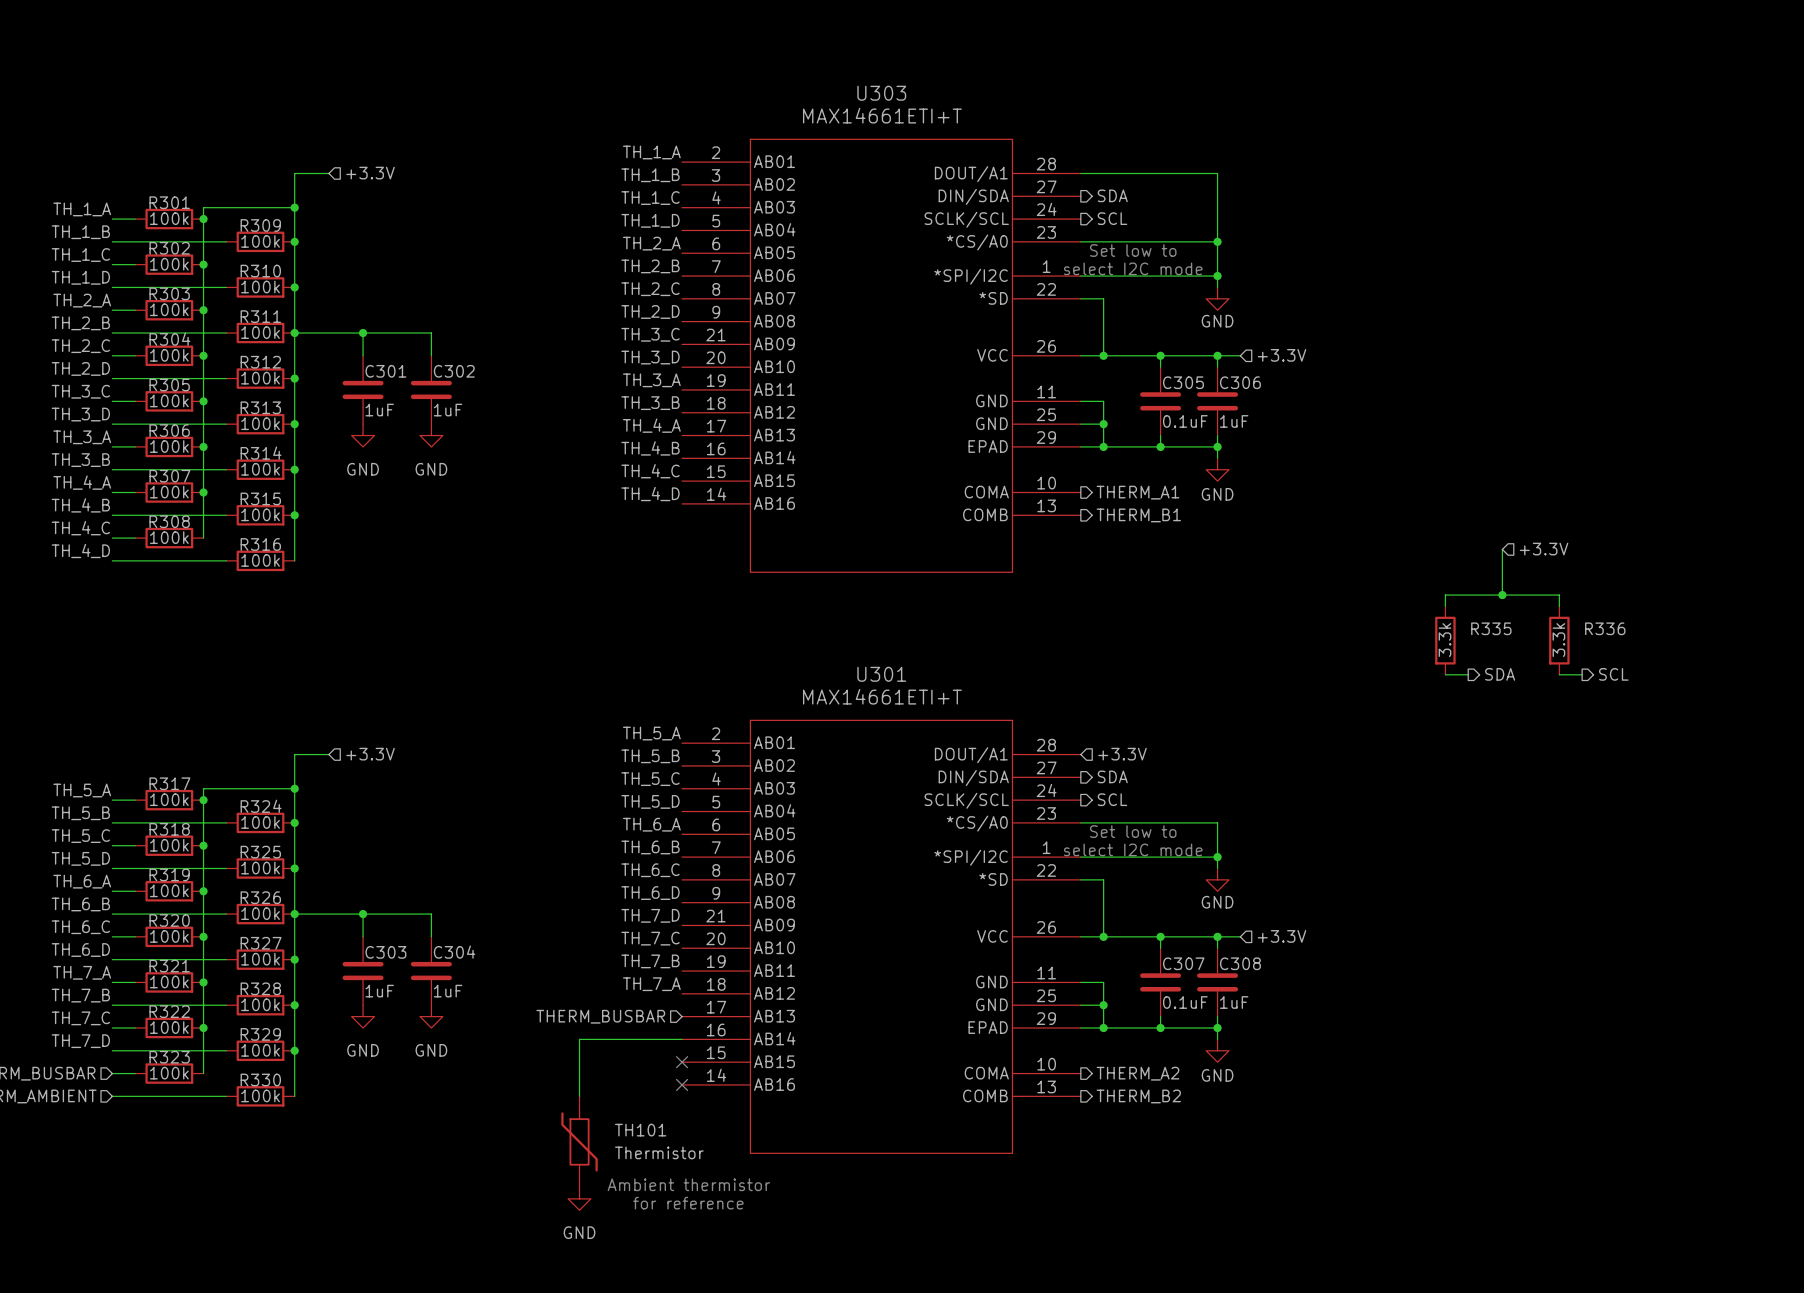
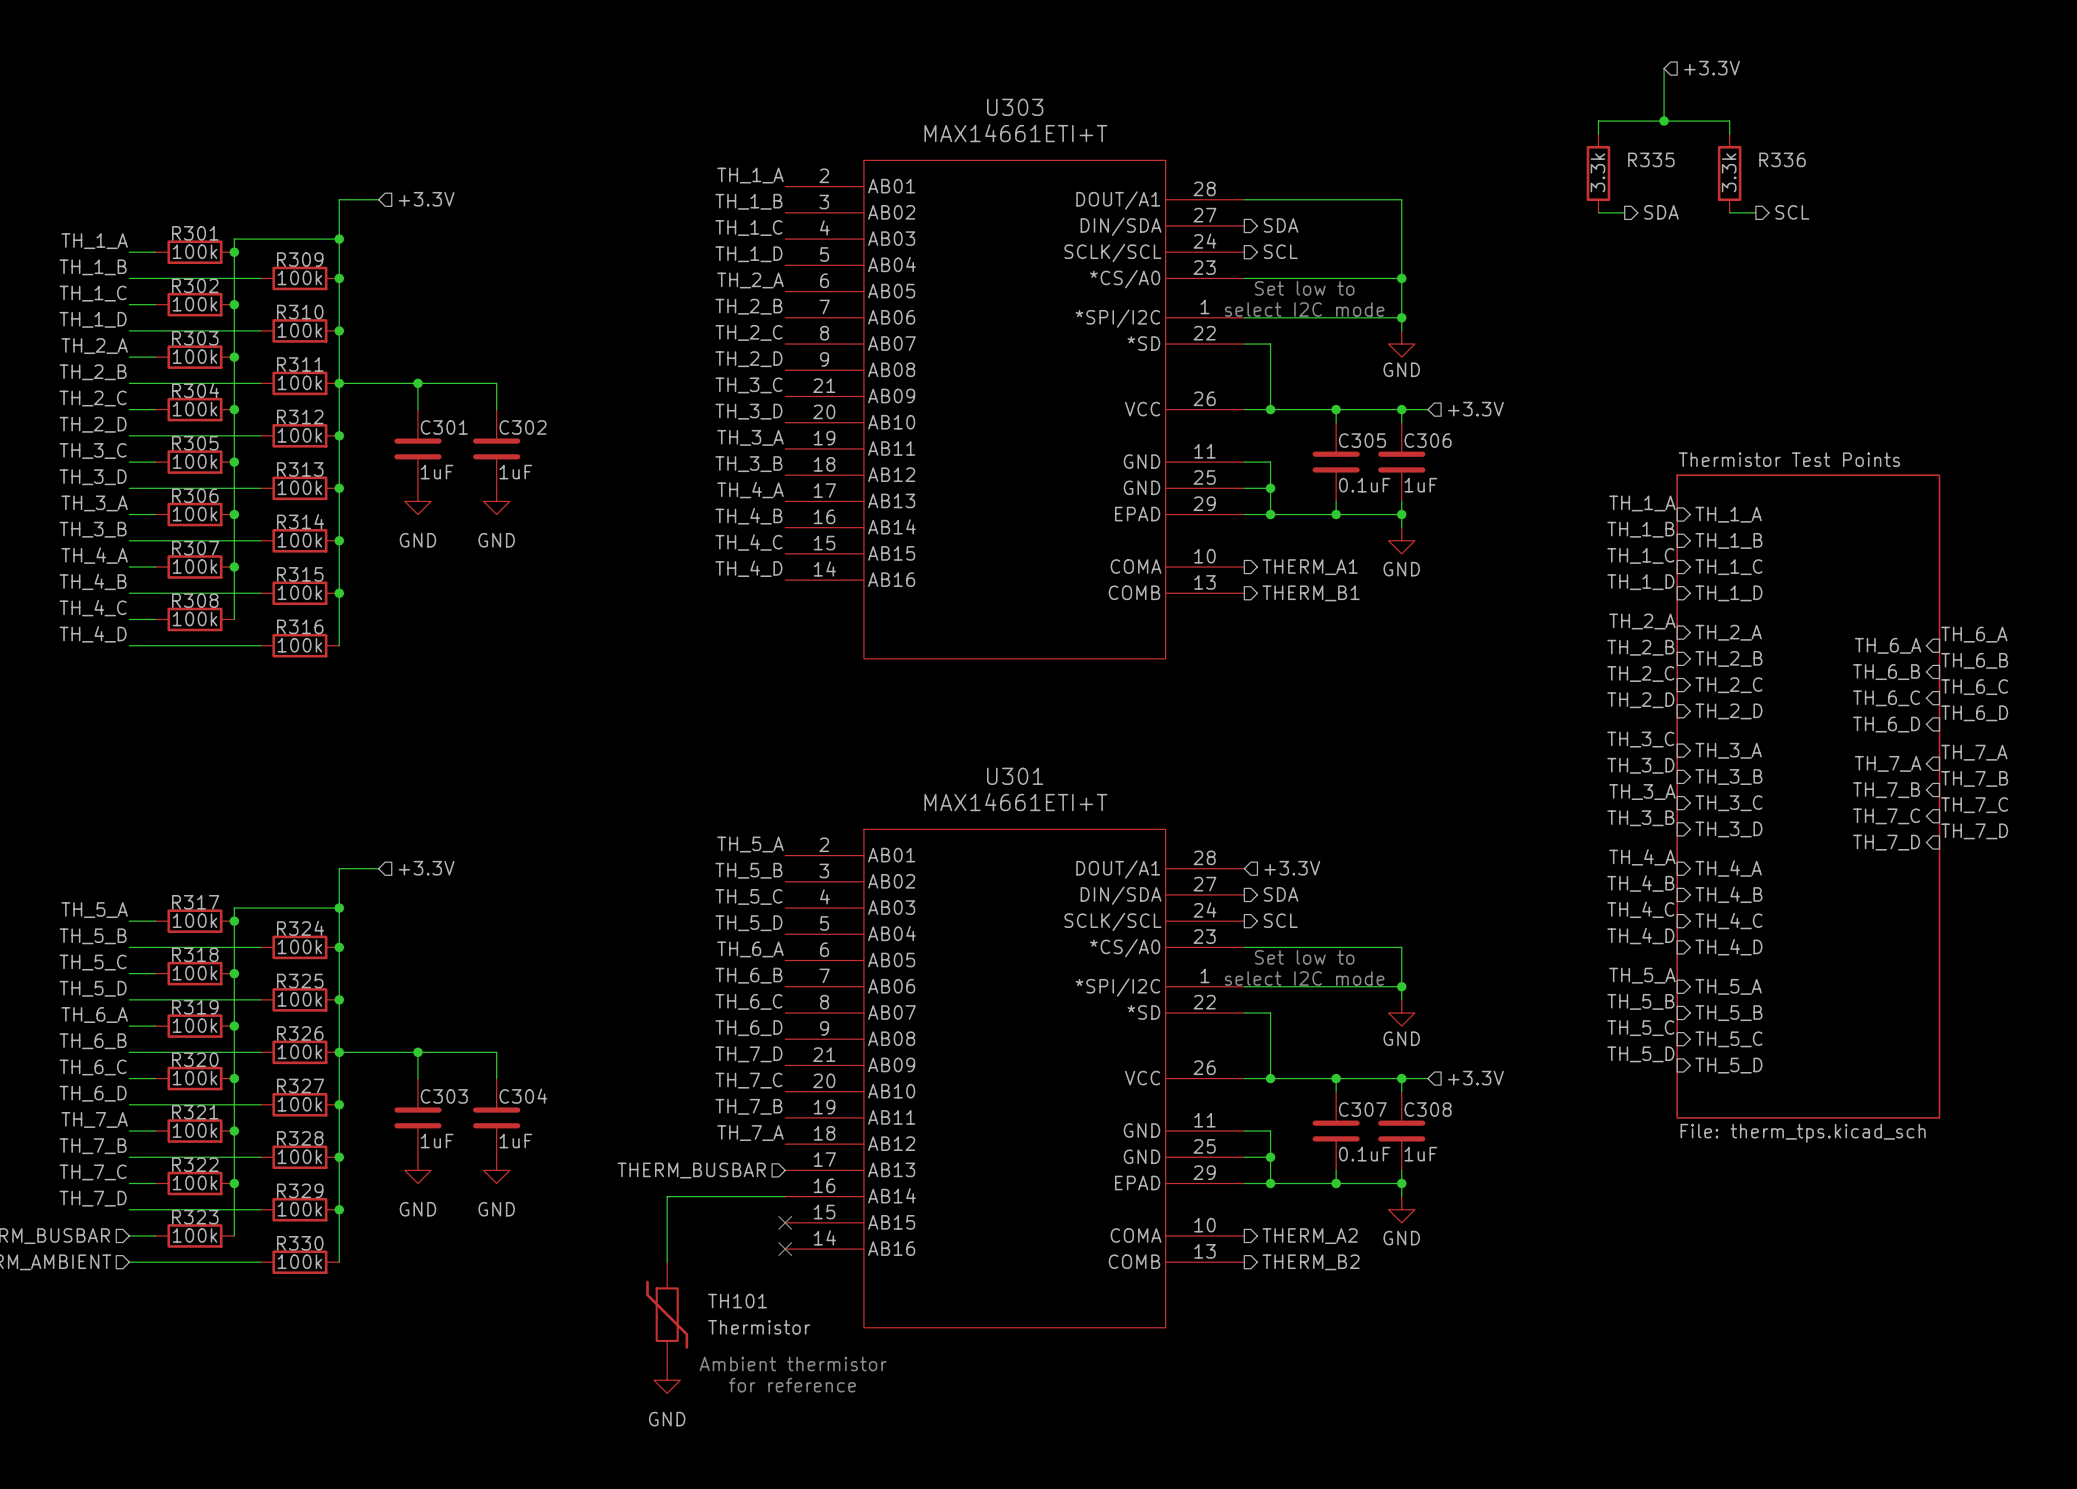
wire: none -> (1664, 68) (1664, 121)
hierarchical label: none -> +3.3V (1712, 68)
junction: none -> (1664, 121)
wire: none -> (1598, 134) (1598, 121) (1729, 121) (1729, 134)
wire: none -> (1598, 212) (1624, 212)
hierarchical label: none -> SDA (1661, 212)
wire: none -> (1729, 212) (1755, 212)
hierarchical label: none -> SCL (1792, 212)
label: none -> TH_1_A (1642, 503)
sheet pin: none -> TH_1_A (1728, 514)
label: none -> TH_1_B (1640, 529)
sheet pin: none -> TH_1_B (1728, 540)
label: none -> TH_1_C (1640, 555)
sheet pin: none -> TH_1_C (1728, 567)
label: none -> TH_1_D (1640, 582)
sheet pin: none -> TH_1_D (1728, 593)
label: none -> TH_2_A (1642, 621)
sheet pin: none -> TH_2_A (1728, 632)
wire: (1502, 549) (1502, 595) -> none
hierarchical label: +3.3V (1544, 549) -> none
label: none -> TH_6_A (1974, 634)
sheet pin: none -> TH_6_A (1888, 645)
label: none -> TH_2_B (1640, 647)
sheet pin: none -> TH_2_B (1728, 658)
label: none -> TH_6_B (1974, 660)
sheet pin: none -> TH_6_B (1886, 672)
label: none -> TH_2_C (1640, 673)
sheet pin: none -> TH_2_C (1728, 685)
junction: (1502, 595) -> none
label: none -> TH_6_C (1974, 687)
wire: (1445, 606) (1445, 595) (1559, 595) (1559, 606) -> none
sheet pin: none -> TH_6_C (1886, 698)
label: none -> TH_2_D (1640, 700)
sheet pin: none -> TH_2_D (1728, 711)
label: none -> TH_6_D (1974, 713)
sheet pin: none -> TH_6_D (1886, 724)
R335 position: (1445, 640) -> (1598, 173)
R336 position: (1559, 640) -> (1729, 173)
label: none -> TH_3_C (1640, 739)
sheet pin: none -> TH_3_A (1728, 750)
label: none -> TH_7_A (1974, 752)
sheet pin: none -> TH_7_A (1888, 763)
label: none -> TH_3_D (1640, 765)
wire: (1445, 674) (1468, 674) -> none
hierarchical label: SDA (1500, 674) -> none
sheet pin: none -> TH_3_B (1728, 777)
wire: (1559, 674) (1582, 674) -> none
hierarchical label: SCL (1613, 674) -> none
label: none -> TH_7_B (1974, 778)
sheet pin: none -> TH_7_B (1886, 790)
label: none -> TH_3_A (1642, 792)
sheet Thermistor Test Points: none -> File: therm_tps.kicad_sch (1808, 796)
sheet pin: none -> TH_3_C (1728, 803)
label: none -> TH_7_C (1974, 805)
sheet pin: none -> TH_7_C (1886, 816)
label: none -> TH_3_B (1640, 818)
sheet pin: none -> TH_3_D (1728, 829)
label: none -> TH_7_D (1974, 831)
sheet pin: none -> TH_7_D (1886, 842)
label: none -> TH_4_A (1642, 857)
sheet pin: none -> TH_4_A (1728, 868)
label: none -> TH_4_B (1640, 883)
sheet pin: none -> TH_4_B (1728, 894)
label: none -> TH_4_C (1640, 909)
sheet pin: none -> TH_4_C (1728, 920)
label: none -> TH_4_D (1640, 936)
sheet pin: none -> TH_4_D (1728, 947)
label: none -> TH_5_A (1642, 975)
sheet pin: none -> TH_5_A (1728, 986)
label: none -> TH_5_B (1640, 1001)
sheet pin: none -> TH_5_B (1728, 1013)
label: none -> TH_5_C (1640, 1028)
sheet pin: none -> TH_5_C (1728, 1039)
label: none -> TH_5_D (1640, 1054)
sheet pin: none -> TH_5_D (1728, 1065)

